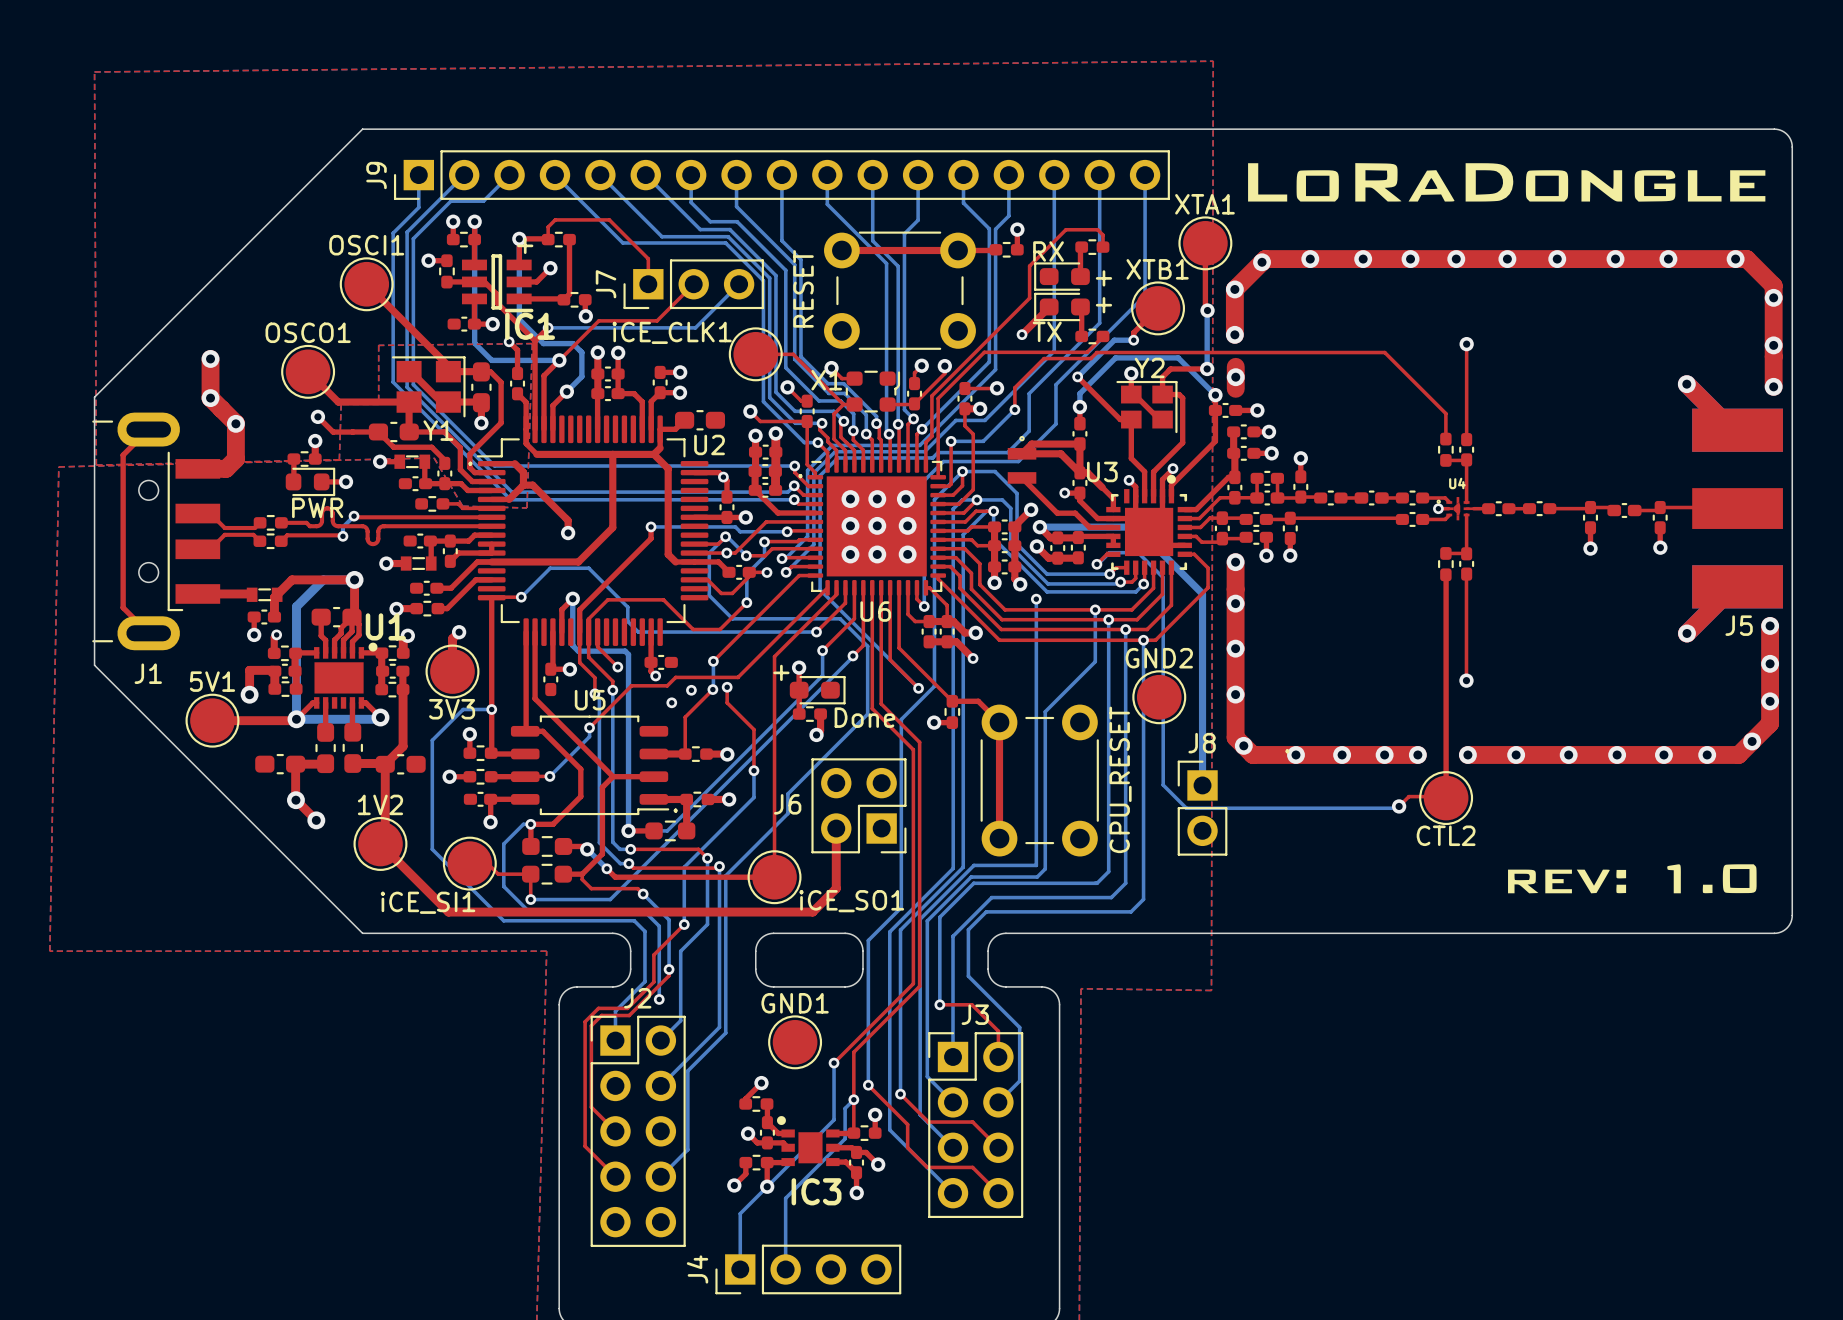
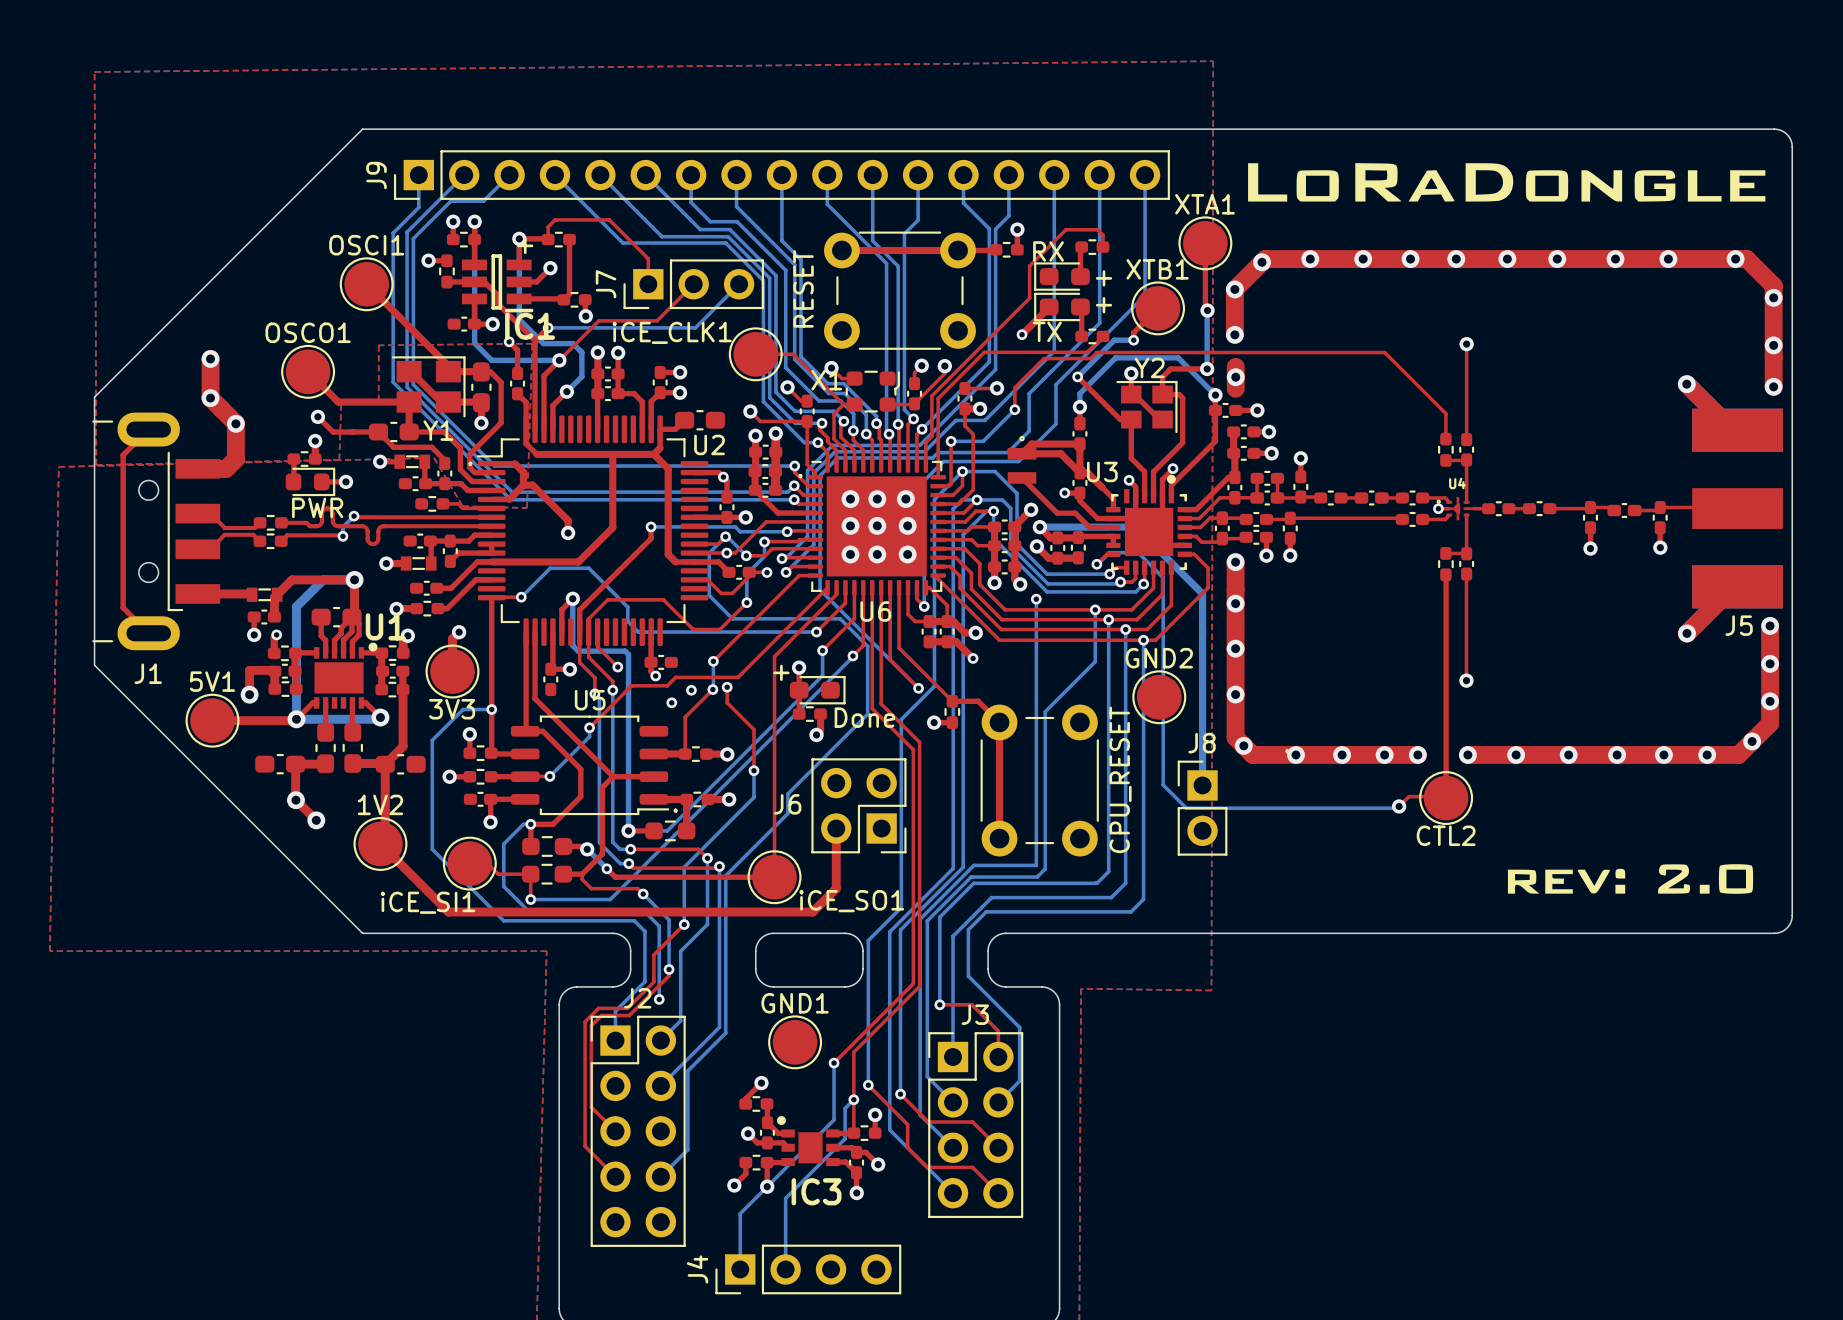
drawing shape: [1508, 864, 1757, 894] -> [1507, 864, 1754, 894]

